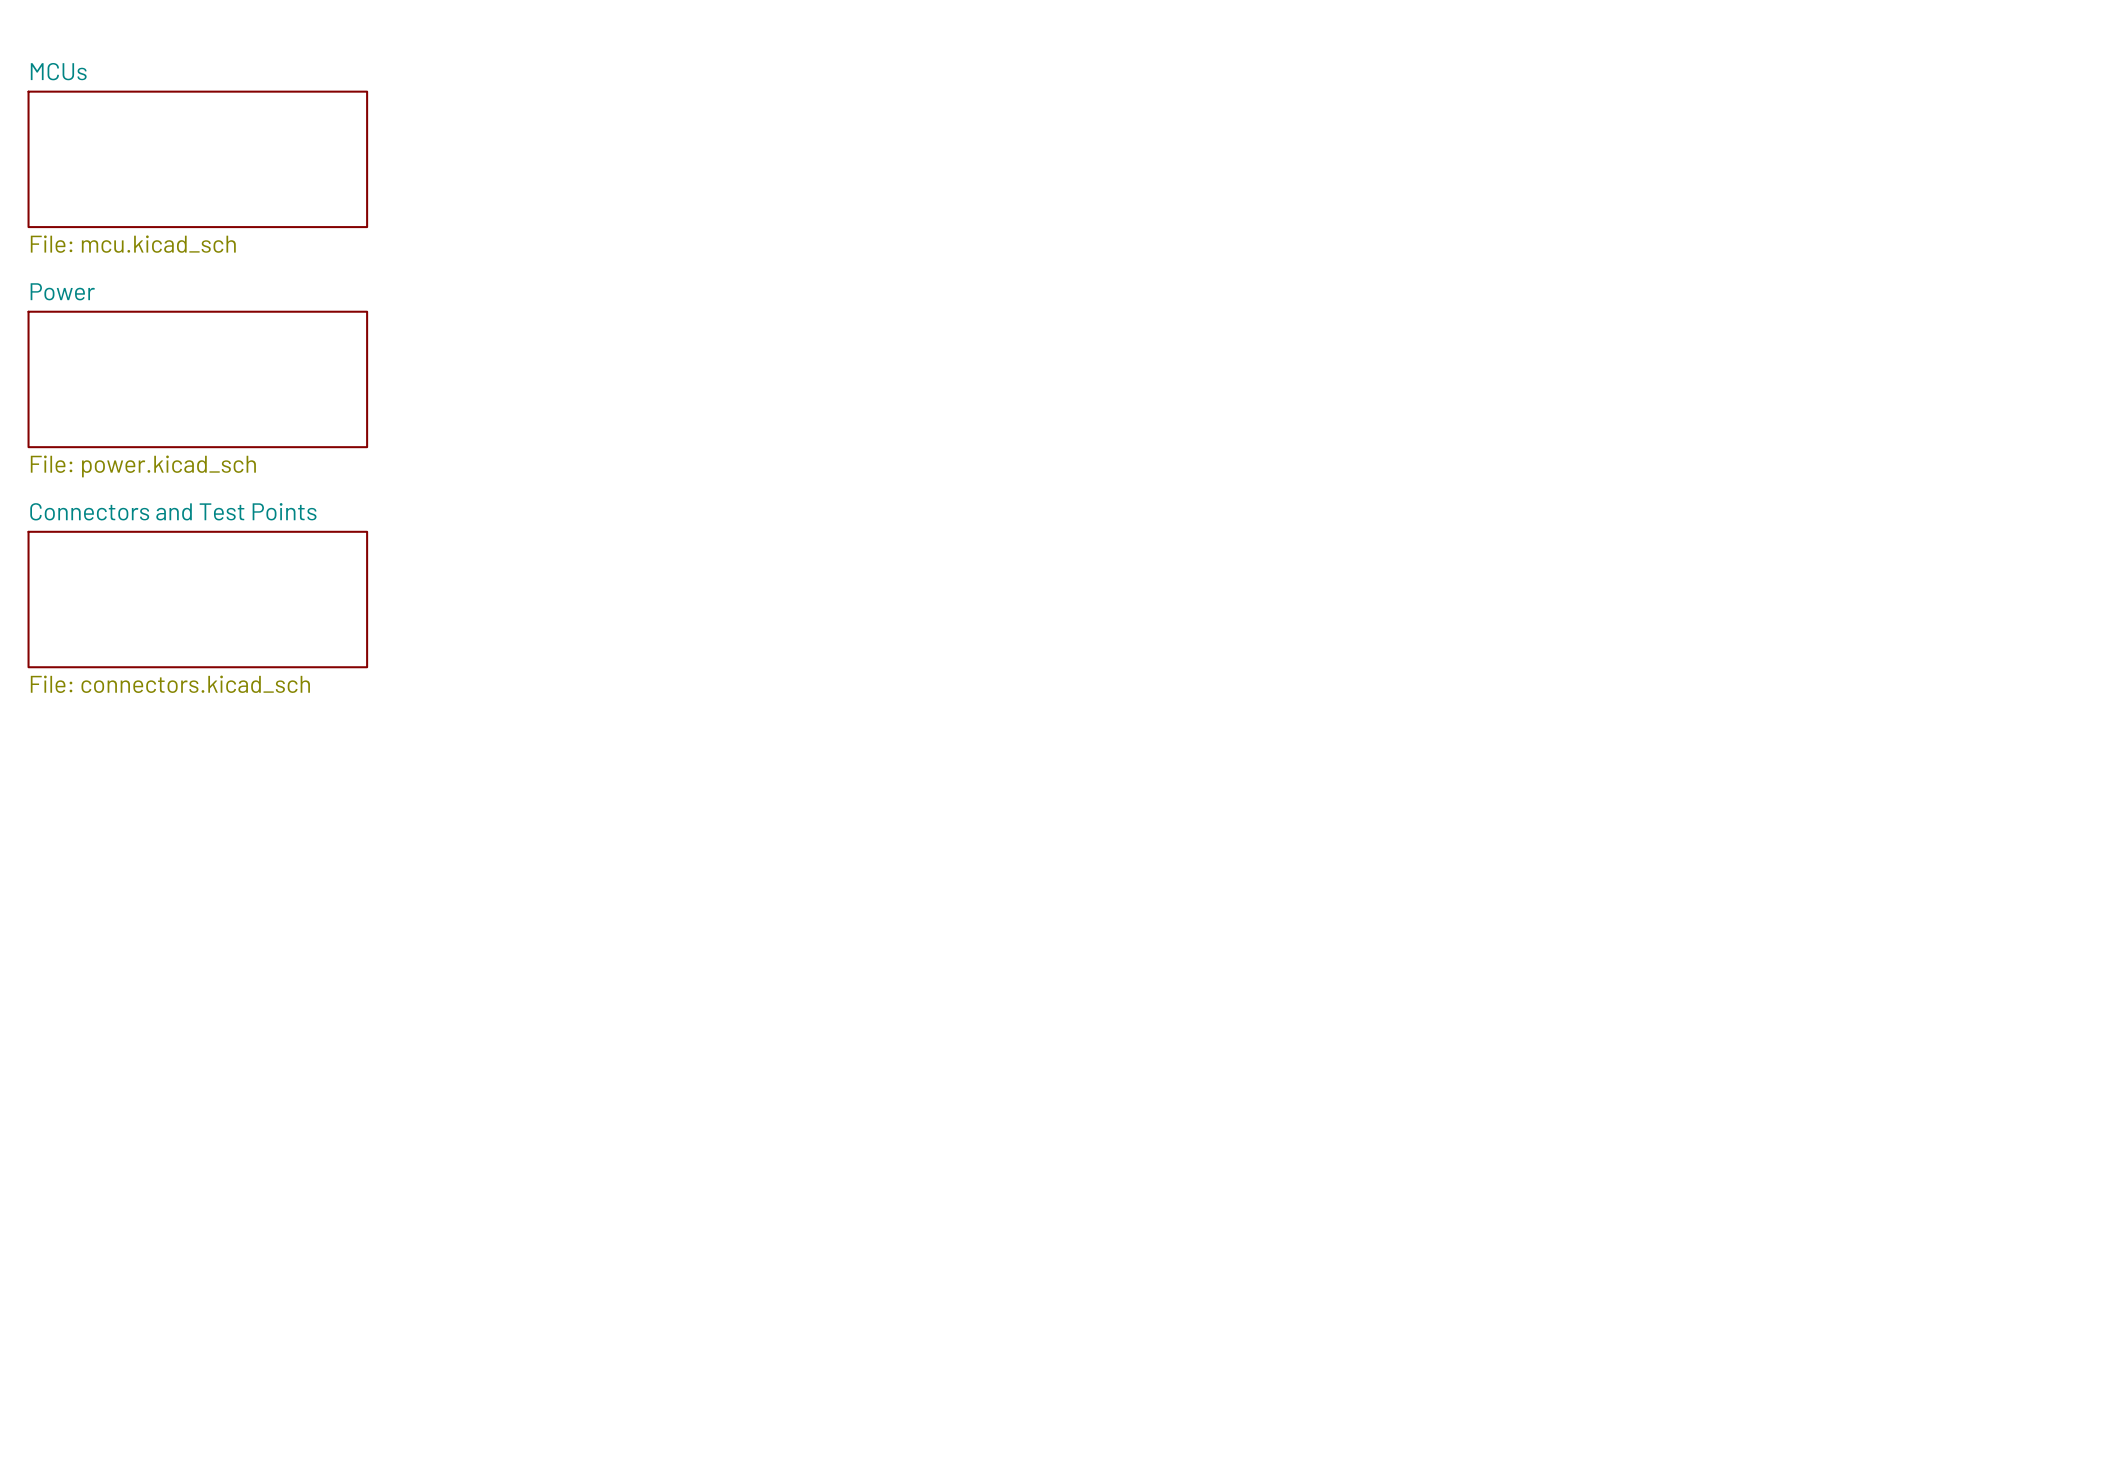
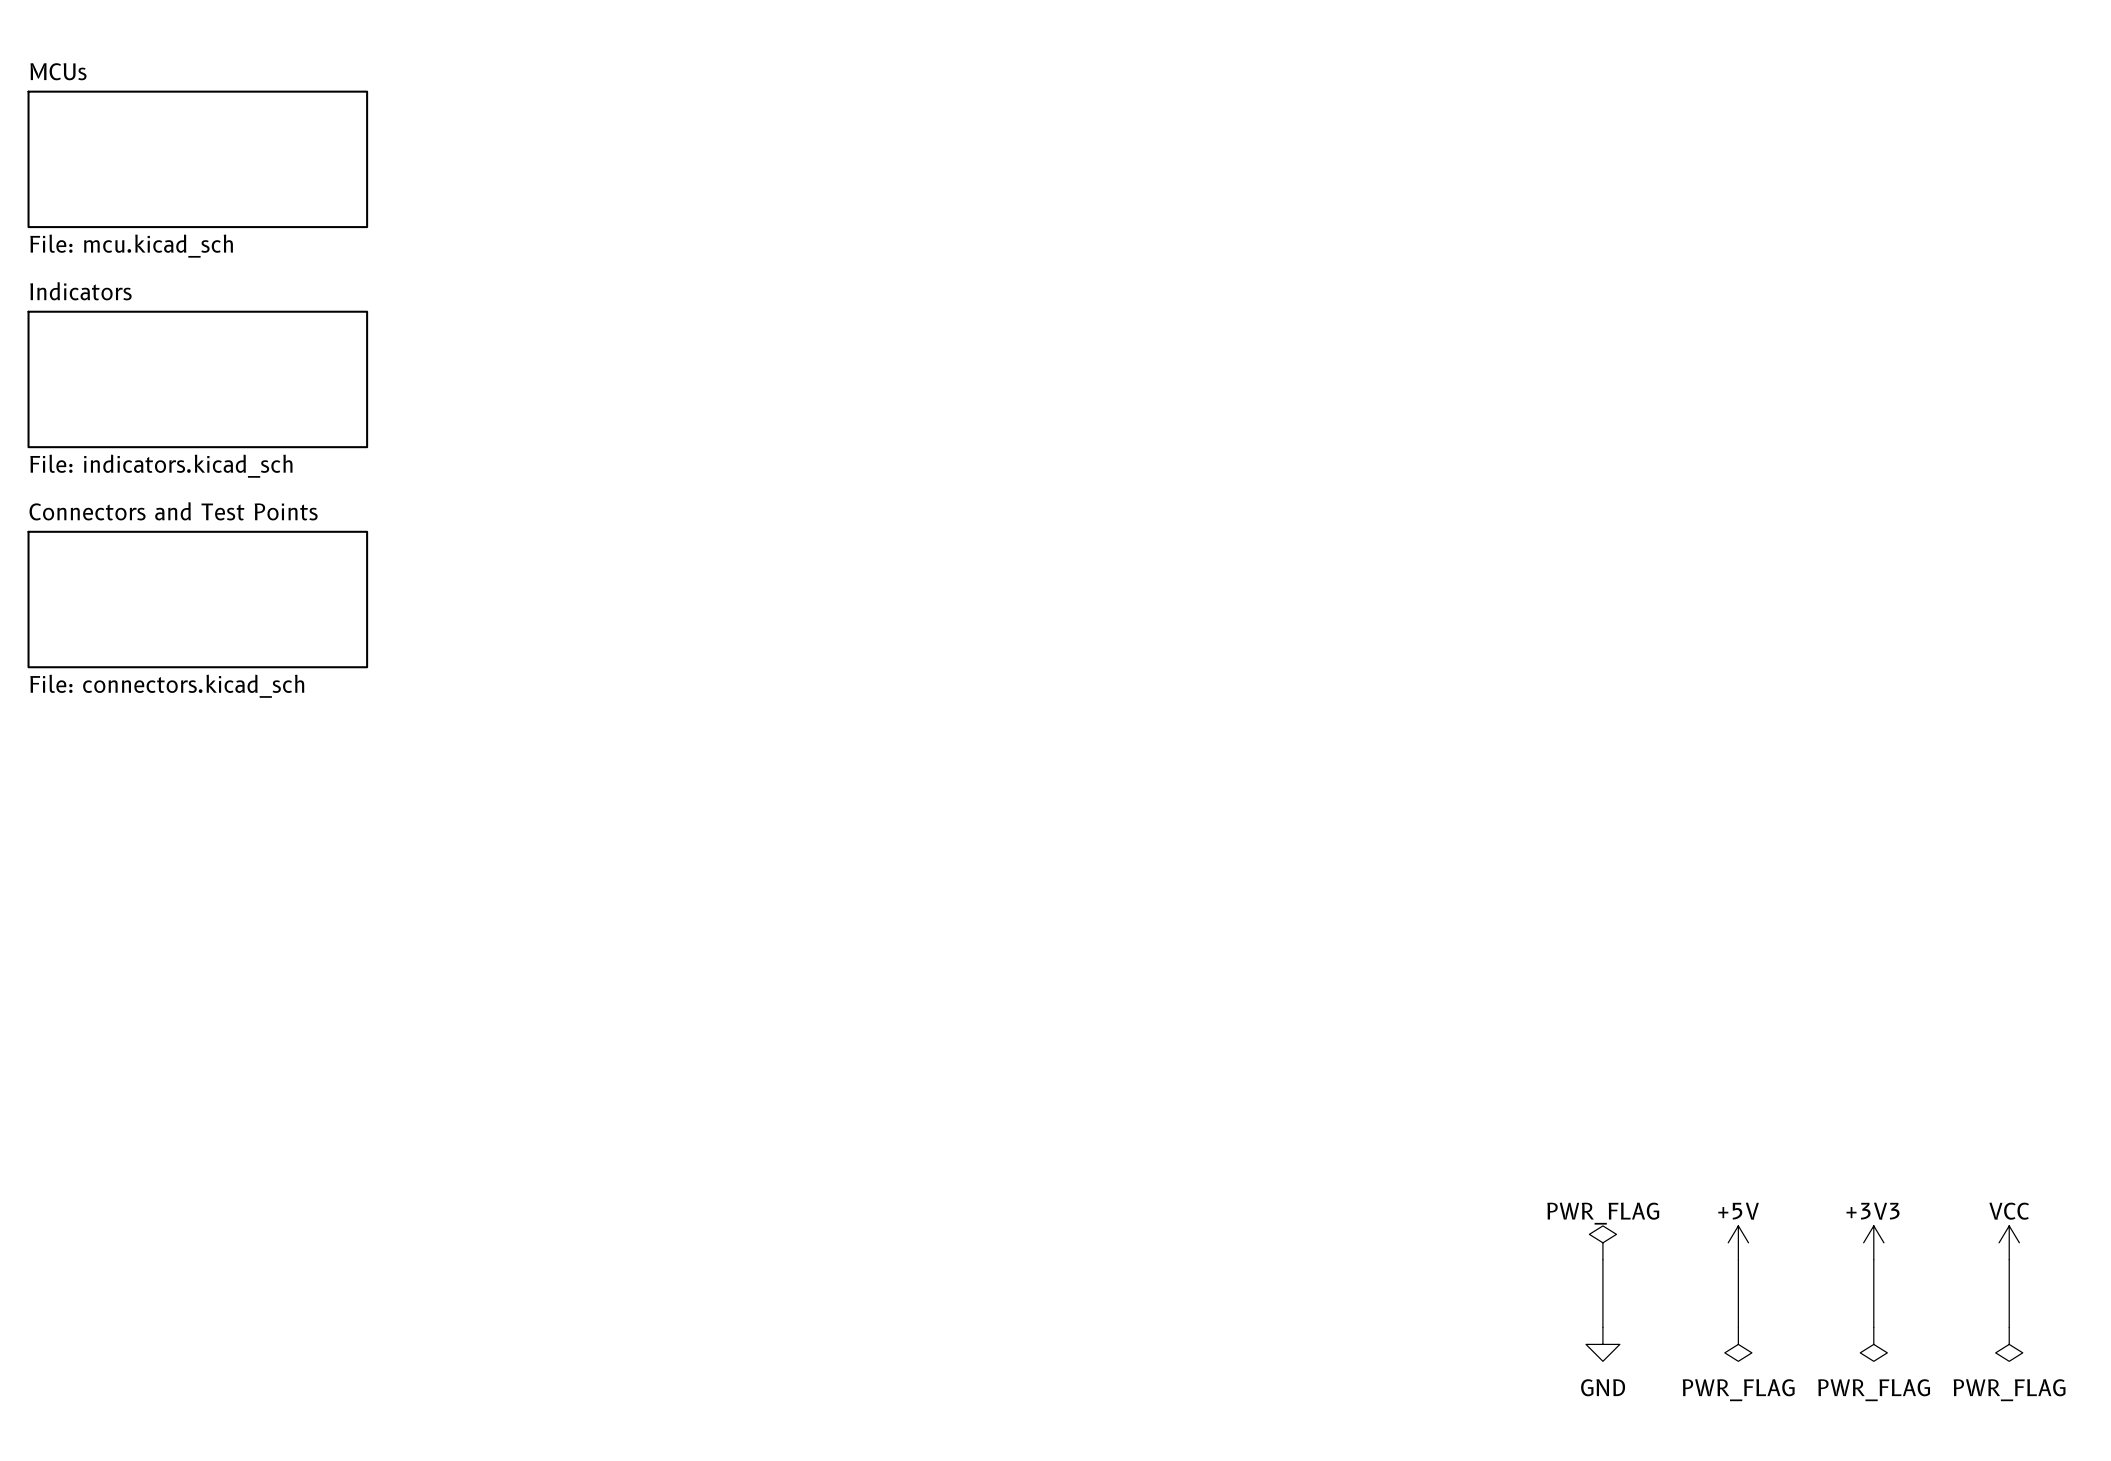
sheet Power name: Power (62, 291) -> Indicators (80, 291)
sheet Power value: File: power.kicad_sch (143, 466) -> File: indicators.kicad_sch (161, 466)
power symbol: none -> PWR_FLAG (1602, 1242)
power symbol: none -> +5V (1738, 1242)
power symbol: none -> +3V3 (1873, 1242)
power symbol: none -> VCC (2009, 1242)
wire: none -> (1602, 1259) (1602, 1327)
wire: none -> (1738, 1259) (1738, 1327)
wire: none -> (1873, 1259) (1873, 1327)
wire: none -> (2009, 1259) (2009, 1327)
power symbol: none -> GND (1602, 1344)
power symbol: none -> PWR_FLAG (1738, 1344)
power symbol: none -> PWR_FLAG (1873, 1344)
power symbol: none -> PWR_FLAG (2009, 1344)

